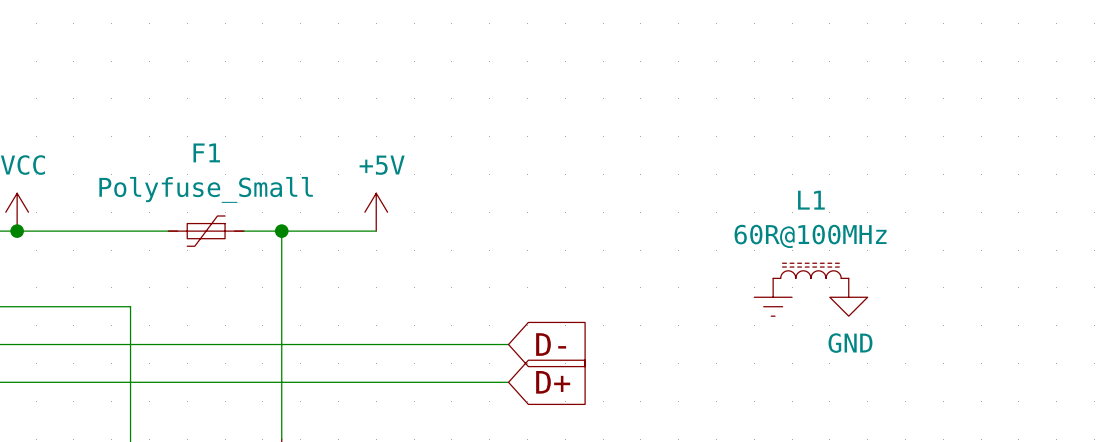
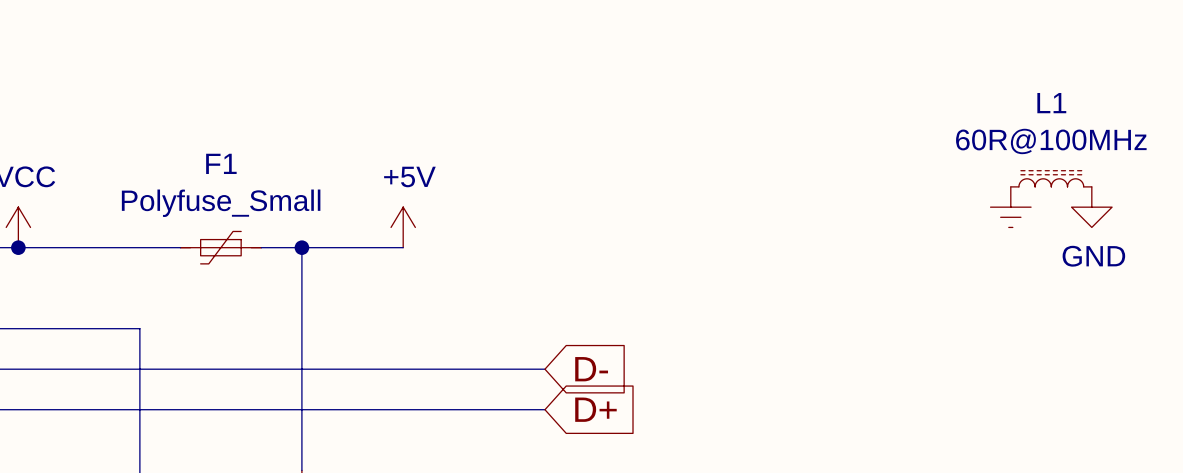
L1 position: (810, 270) -> (1051, 178)
power symbol position: (773, 297) -> (1010, 207)
power symbol position: GND (848, 297) -> GND (1091, 207)

